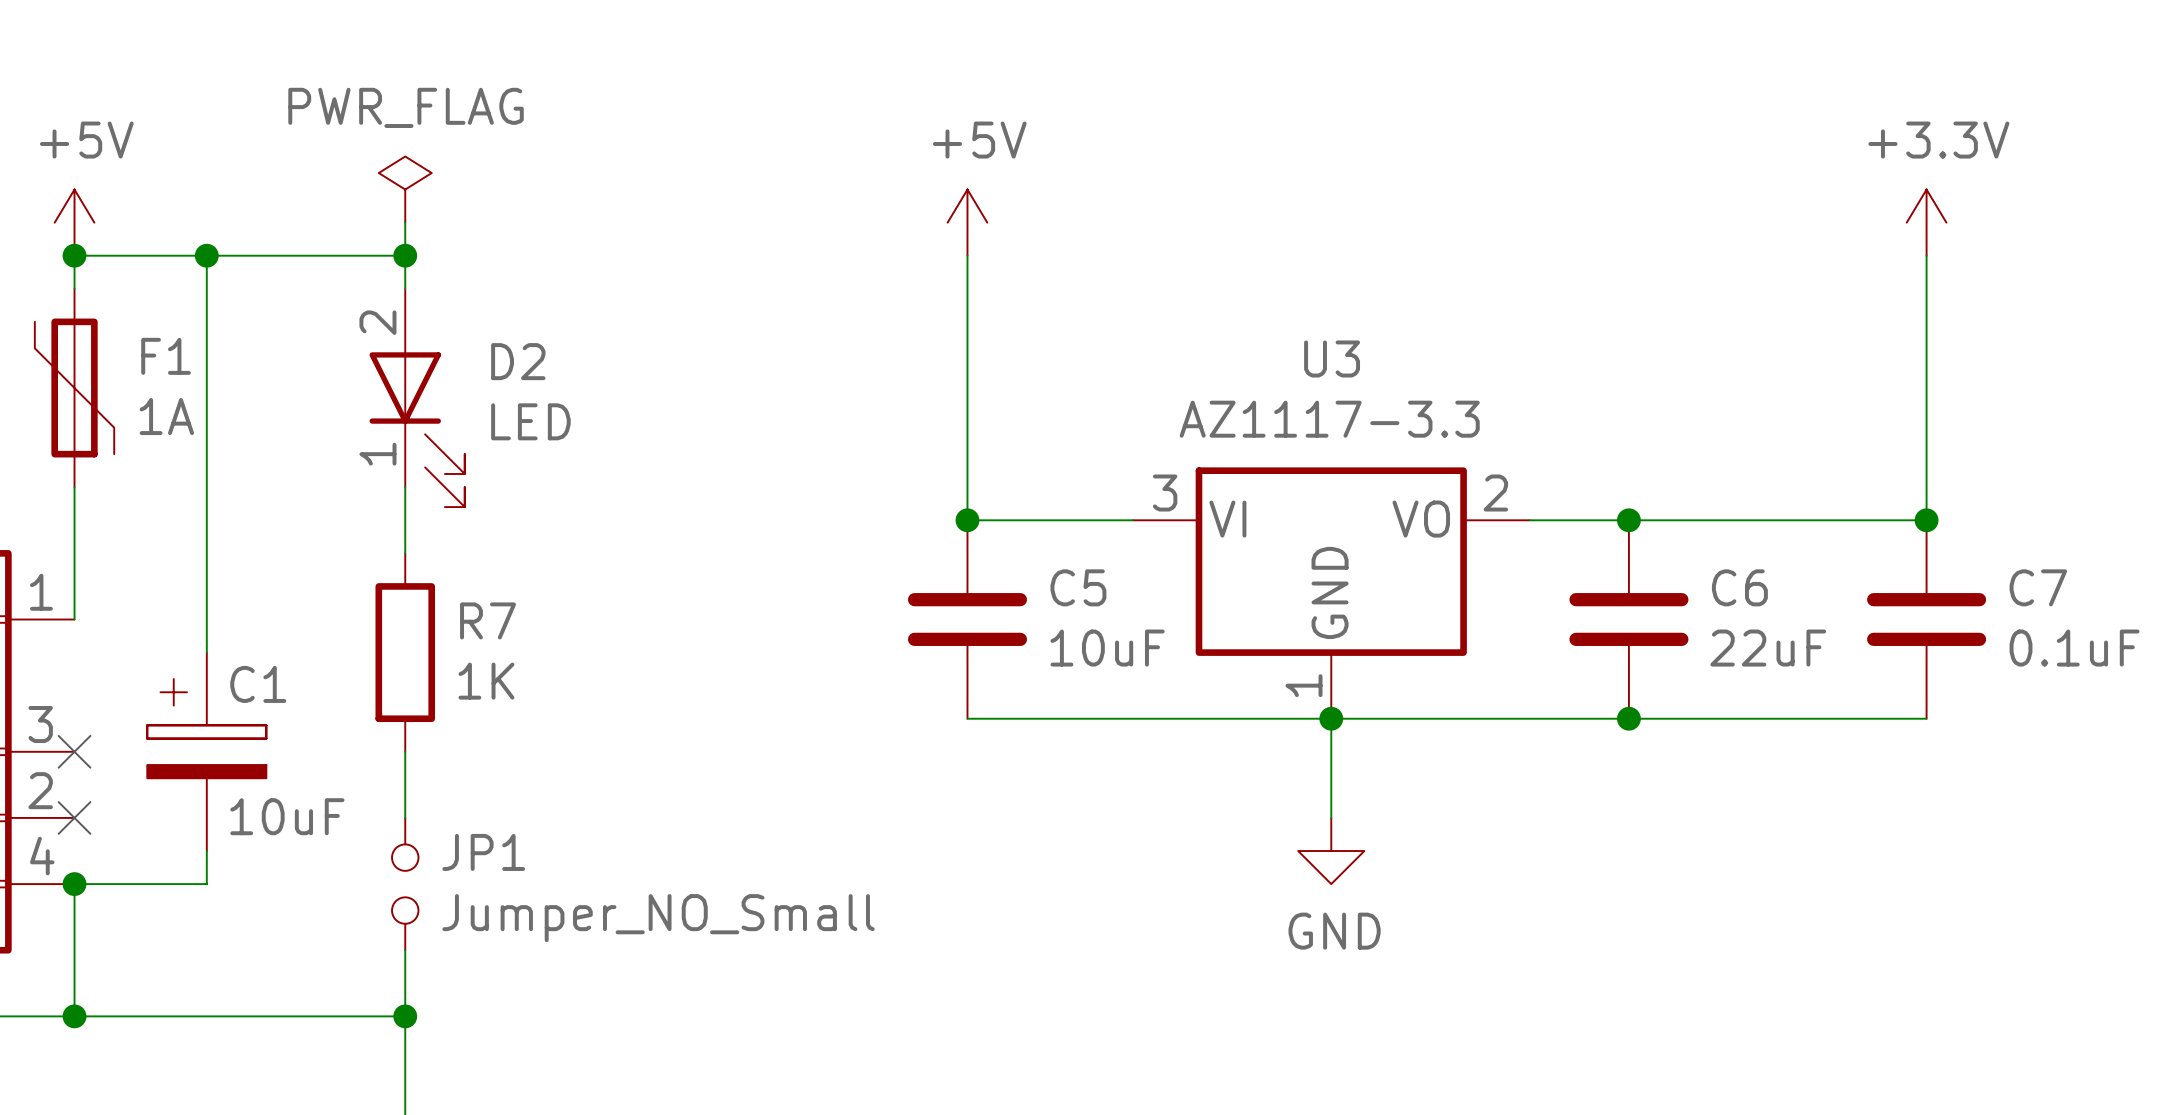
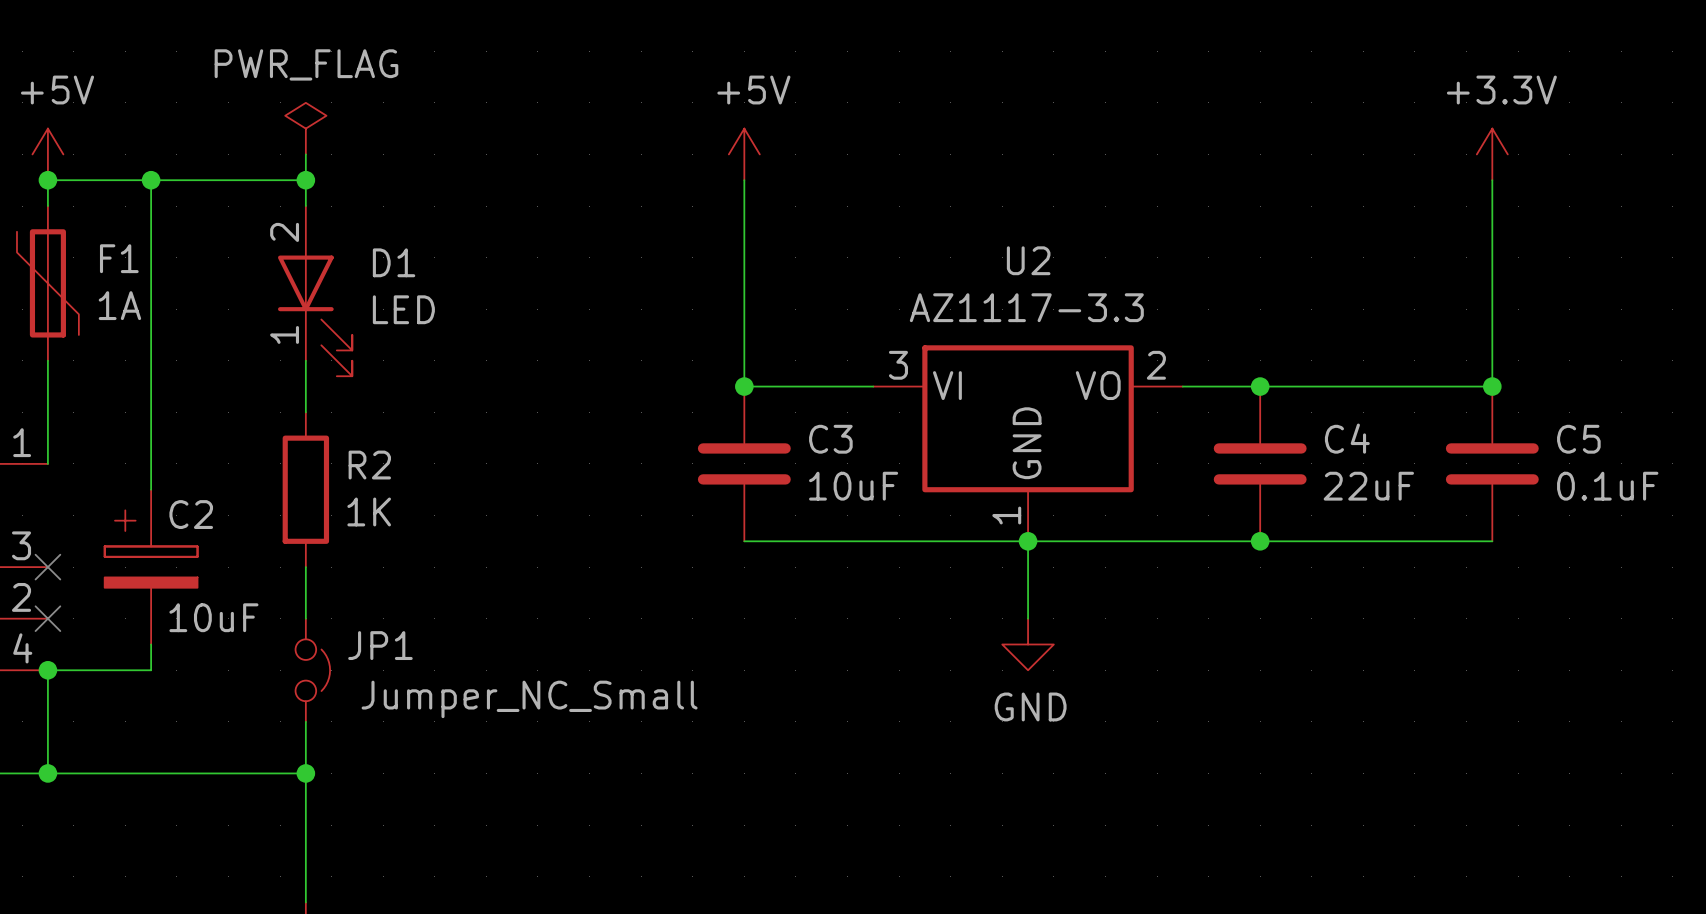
U3 name: U3 (1332, 358) -> U2 (1028, 260)
D2 name: D2 (518, 361) -> D1 (394, 262)
C5 name: C5 (1078, 587) -> C3 (830, 439)
C6 name: C6 (1739, 587) -> C4 (1347, 438)
C7 name: C7 (2038, 587) -> C5 (1578, 439)
R7 name: R7 (488, 620) -> R2 (369, 465)
C1 name: C1 (258, 684) -> C2 (191, 514)
JP1 symbol: [392, 817, 419, 951] -> [295, 618, 331, 722]
JP1 value: Jumper_NO_Small (658, 918) -> Jumper_NC_Small (529, 699)

